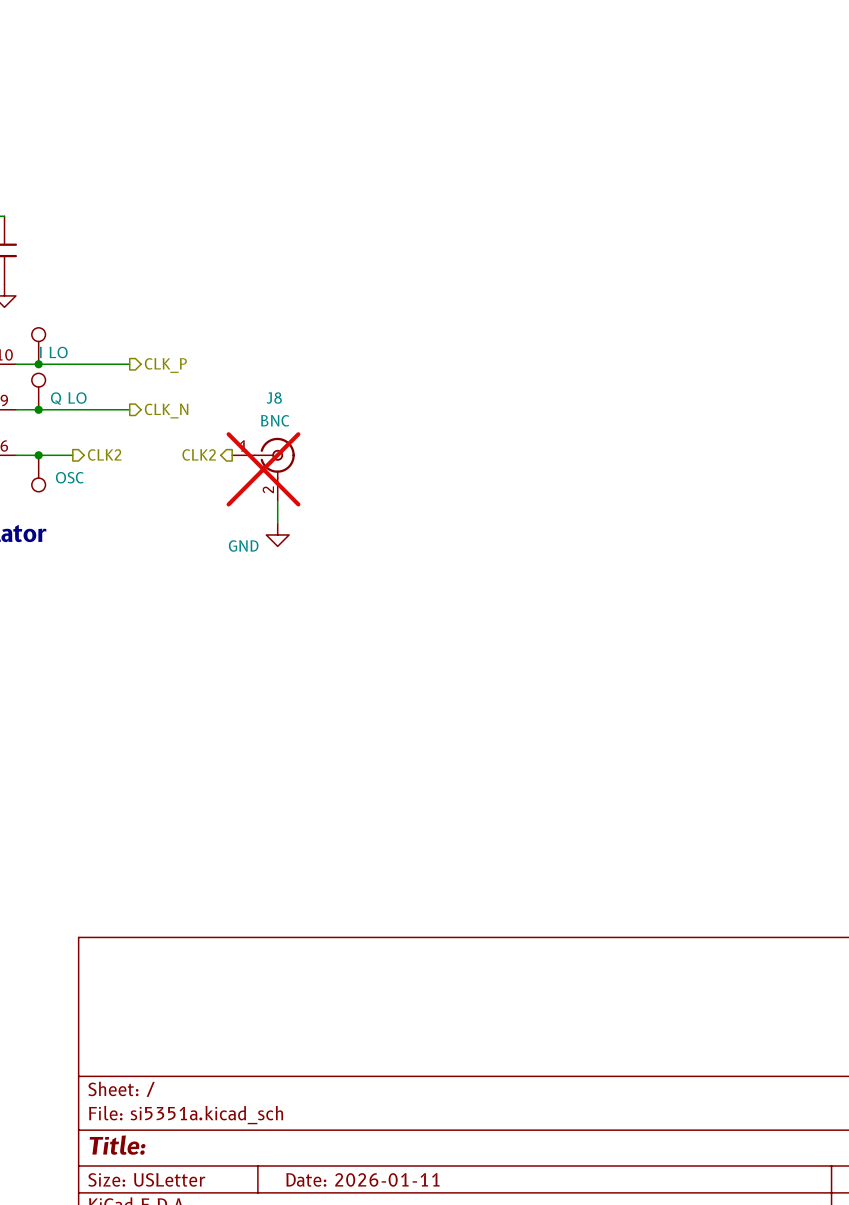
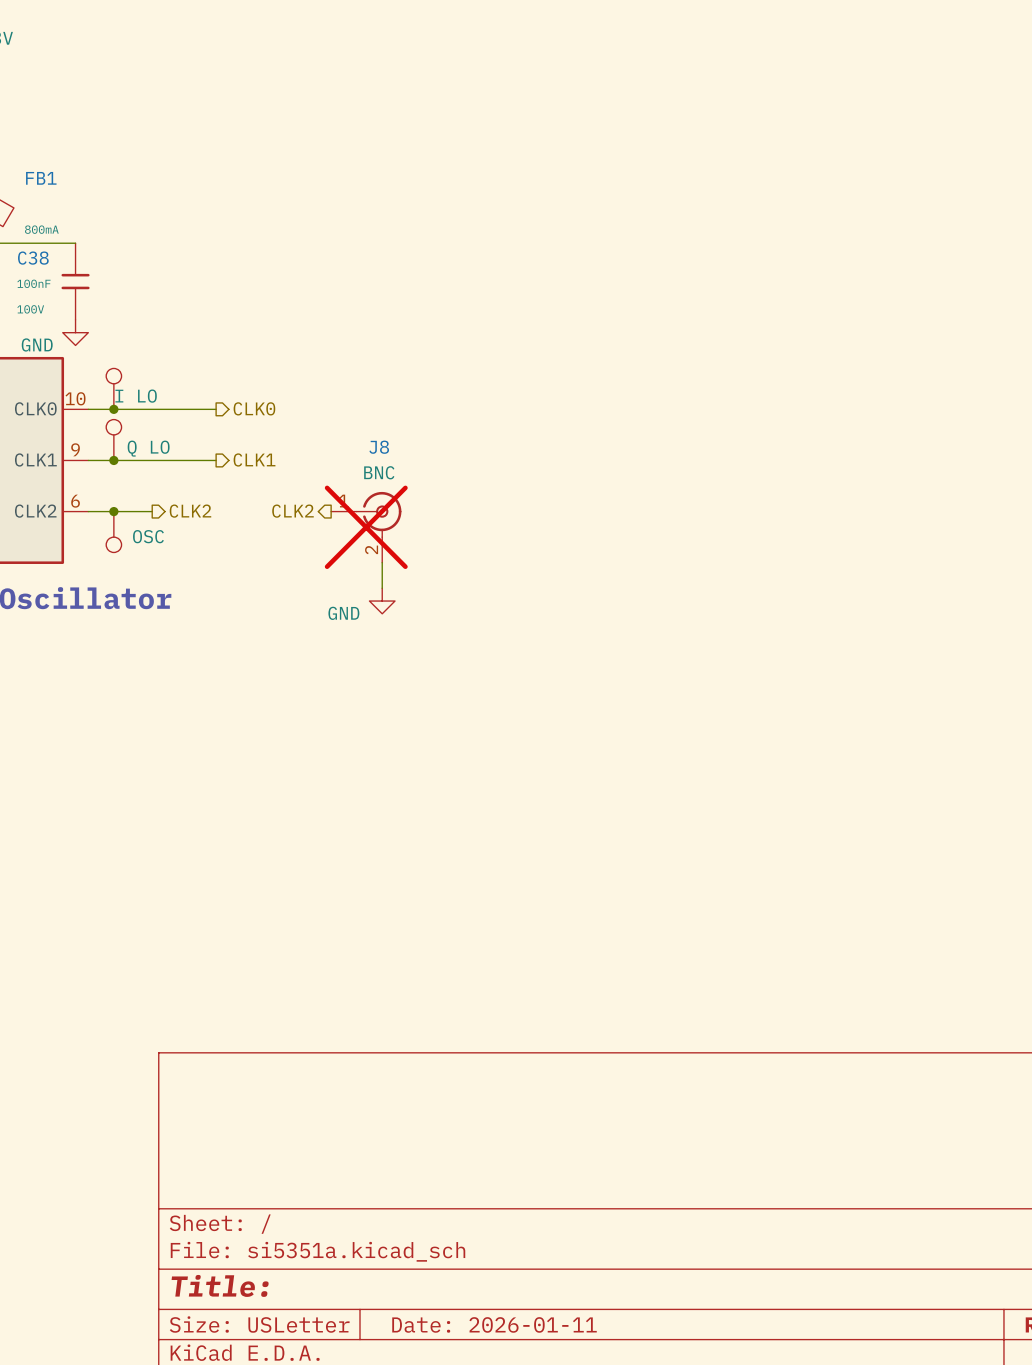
hierarchical label: CLK_P (165, 365) -> CLK0 (254, 408)
hierarchical label: CLK_N (166, 411) -> CLK1 (254, 459)

